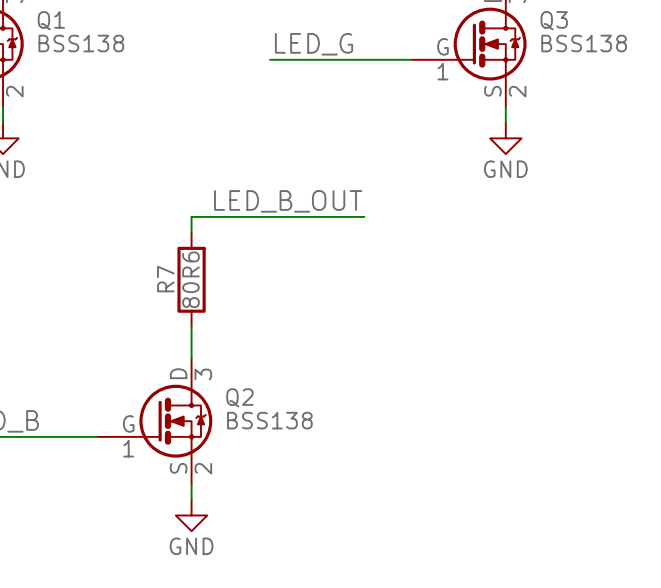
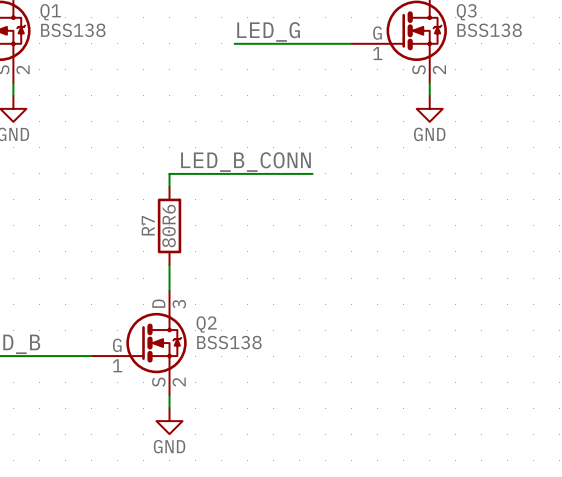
label: LED_B_OUT (288, 201) -> LED_B_CONN (245, 162)

